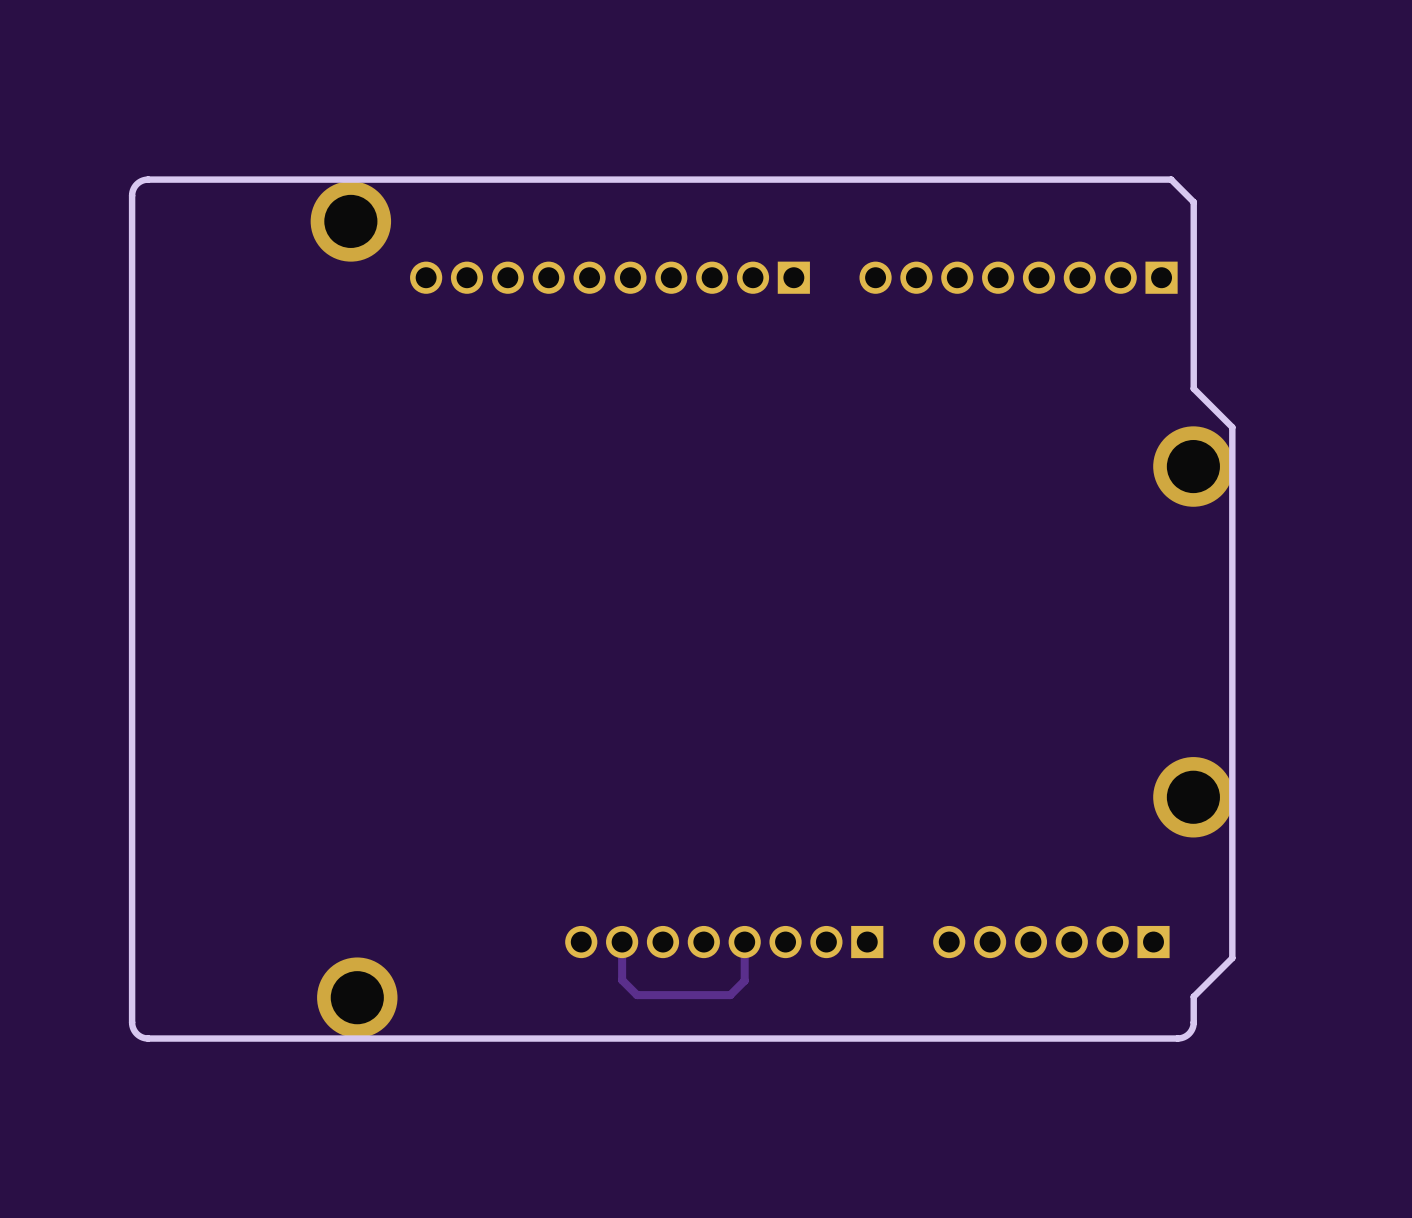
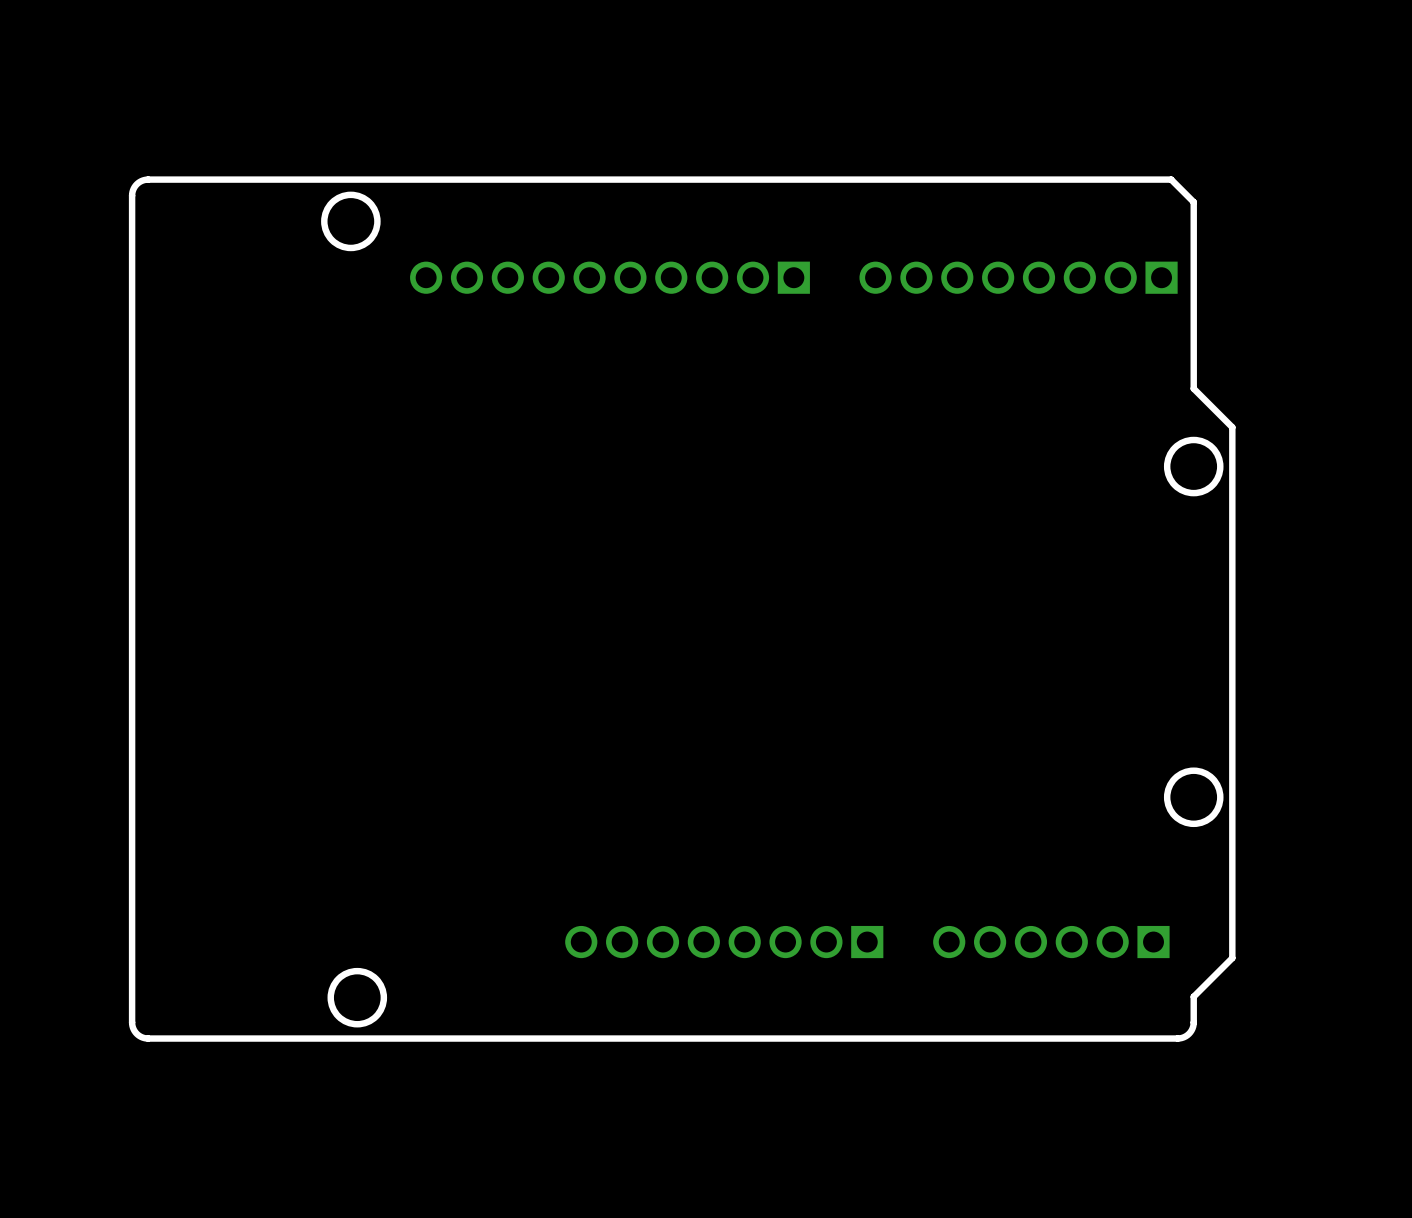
round board edge: none -> [321, 191, 381, 252]
via: (350, 221) -> none
round board edge: none -> [1163, 436, 1224, 497]
via: (1193, 466) -> none
round board edge: none -> [1163, 767, 1224, 828]
via: (1193, 797) -> none
track: (622, 942) (622, 980) (637, 995) (730, 995) (744, 980) (744, 942) -> none
round board edge: none -> [327, 967, 388, 1028]
via: (357, 997) -> none

